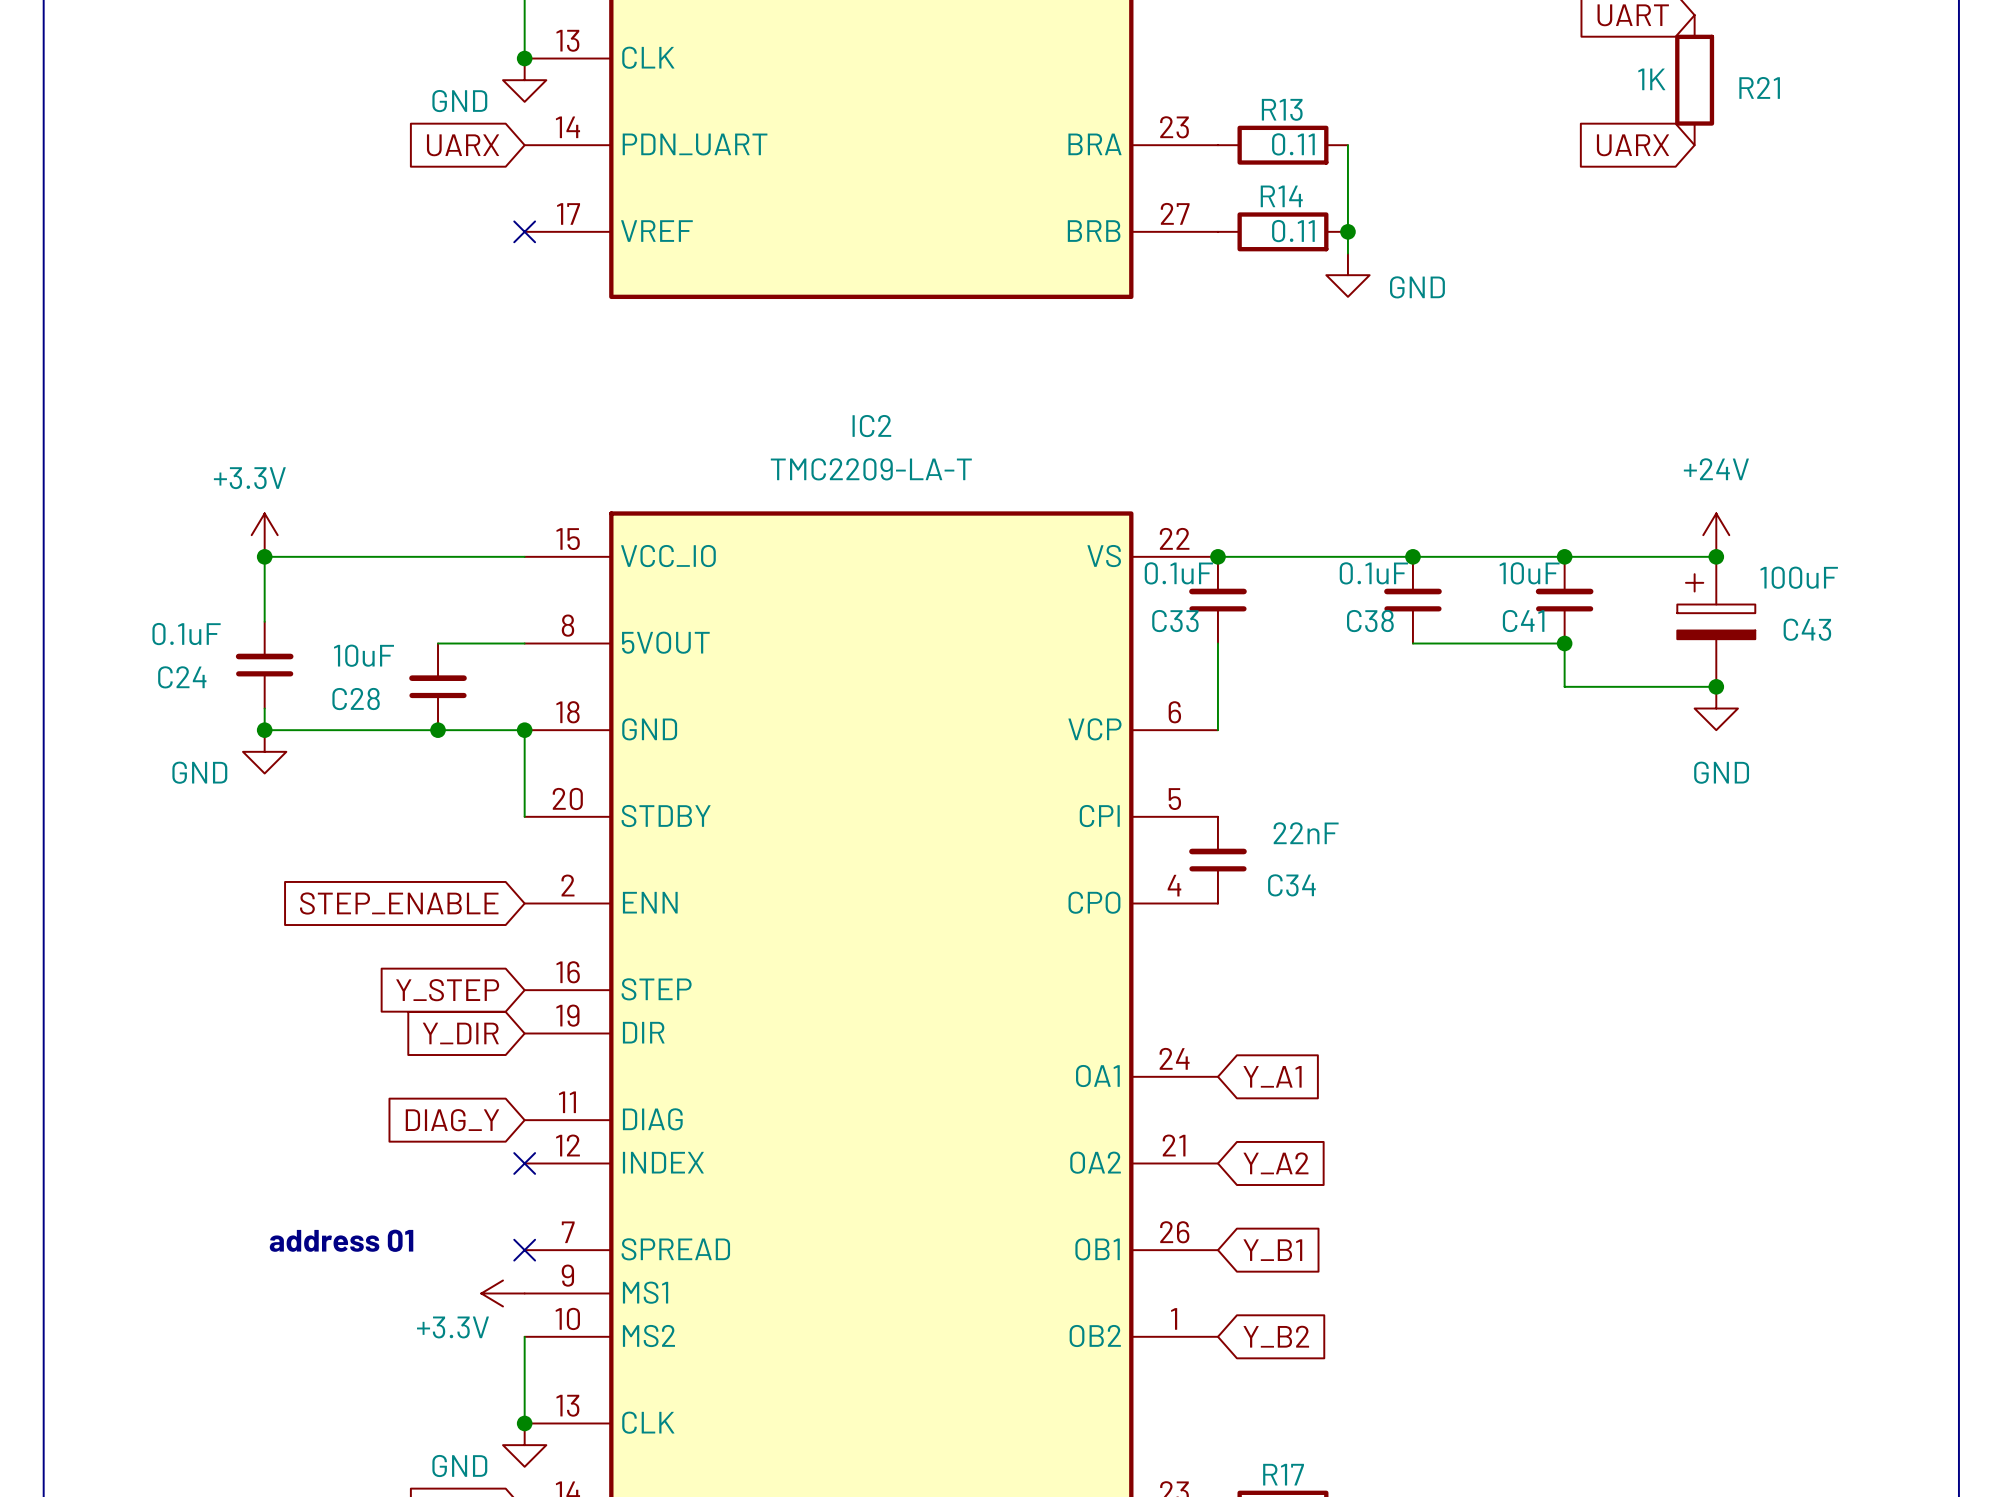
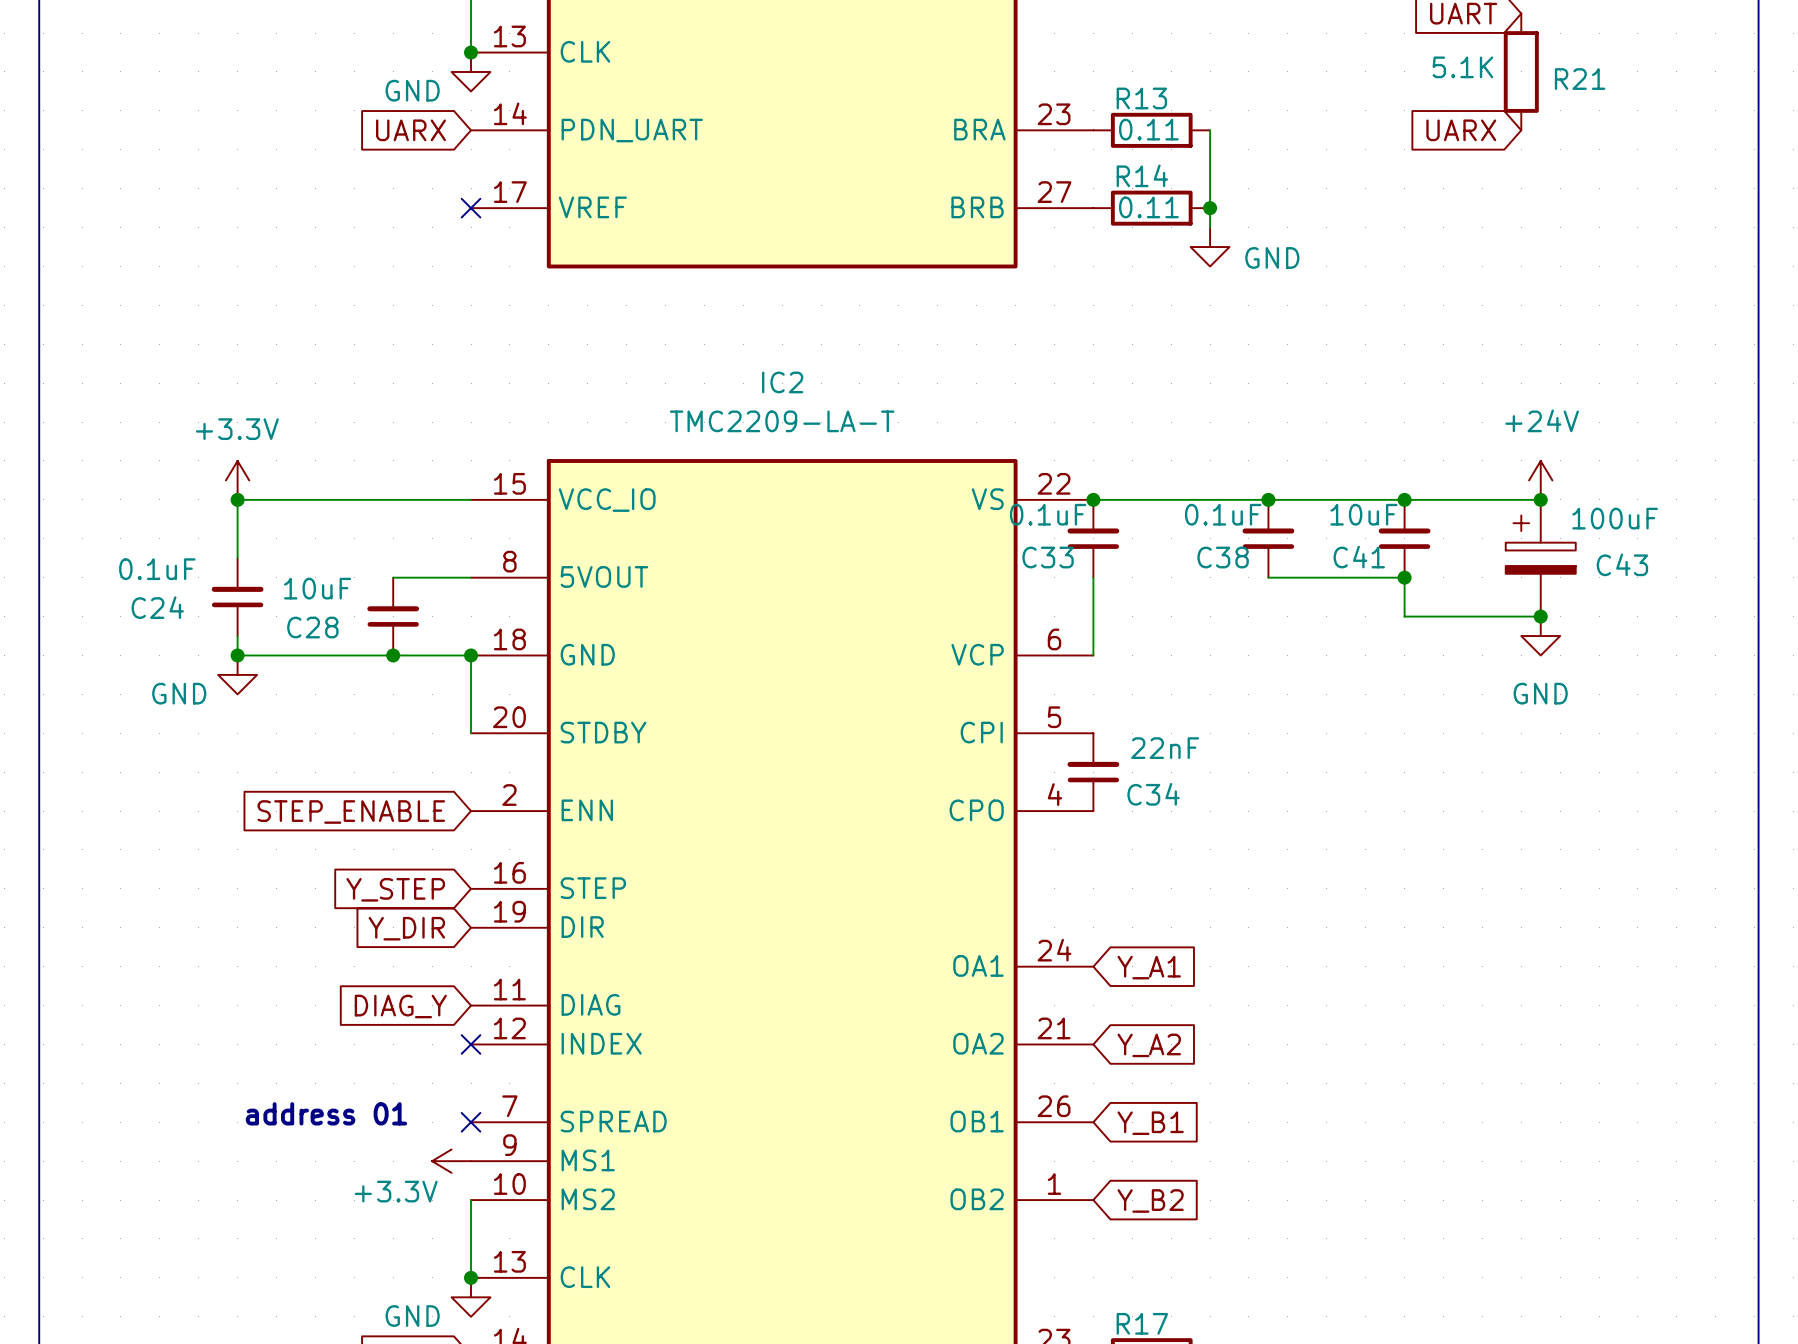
R21 value: 1K (1651, 79) -> 5.1K (1462, 67)

